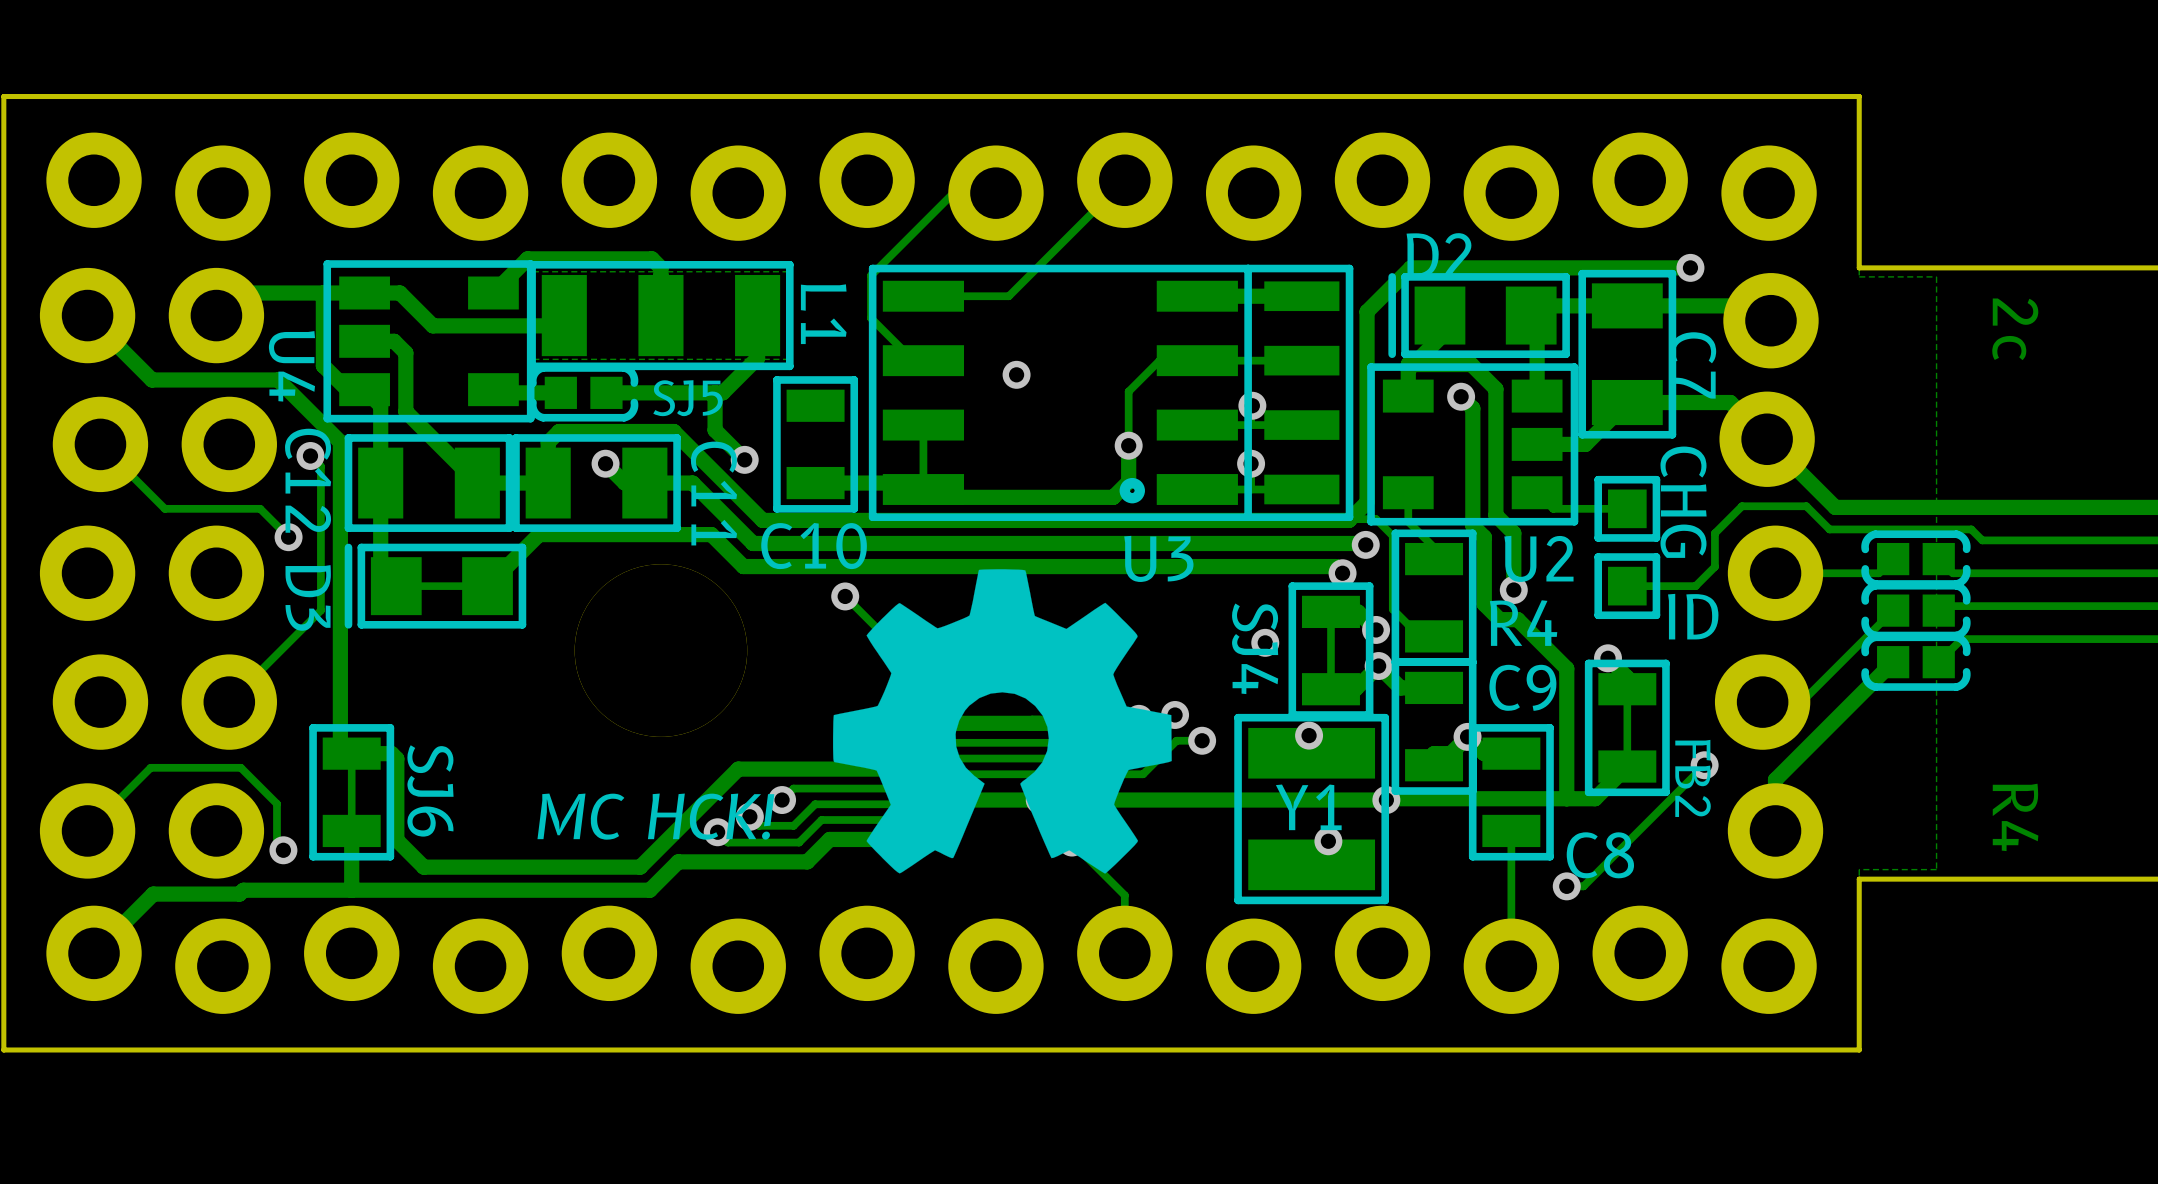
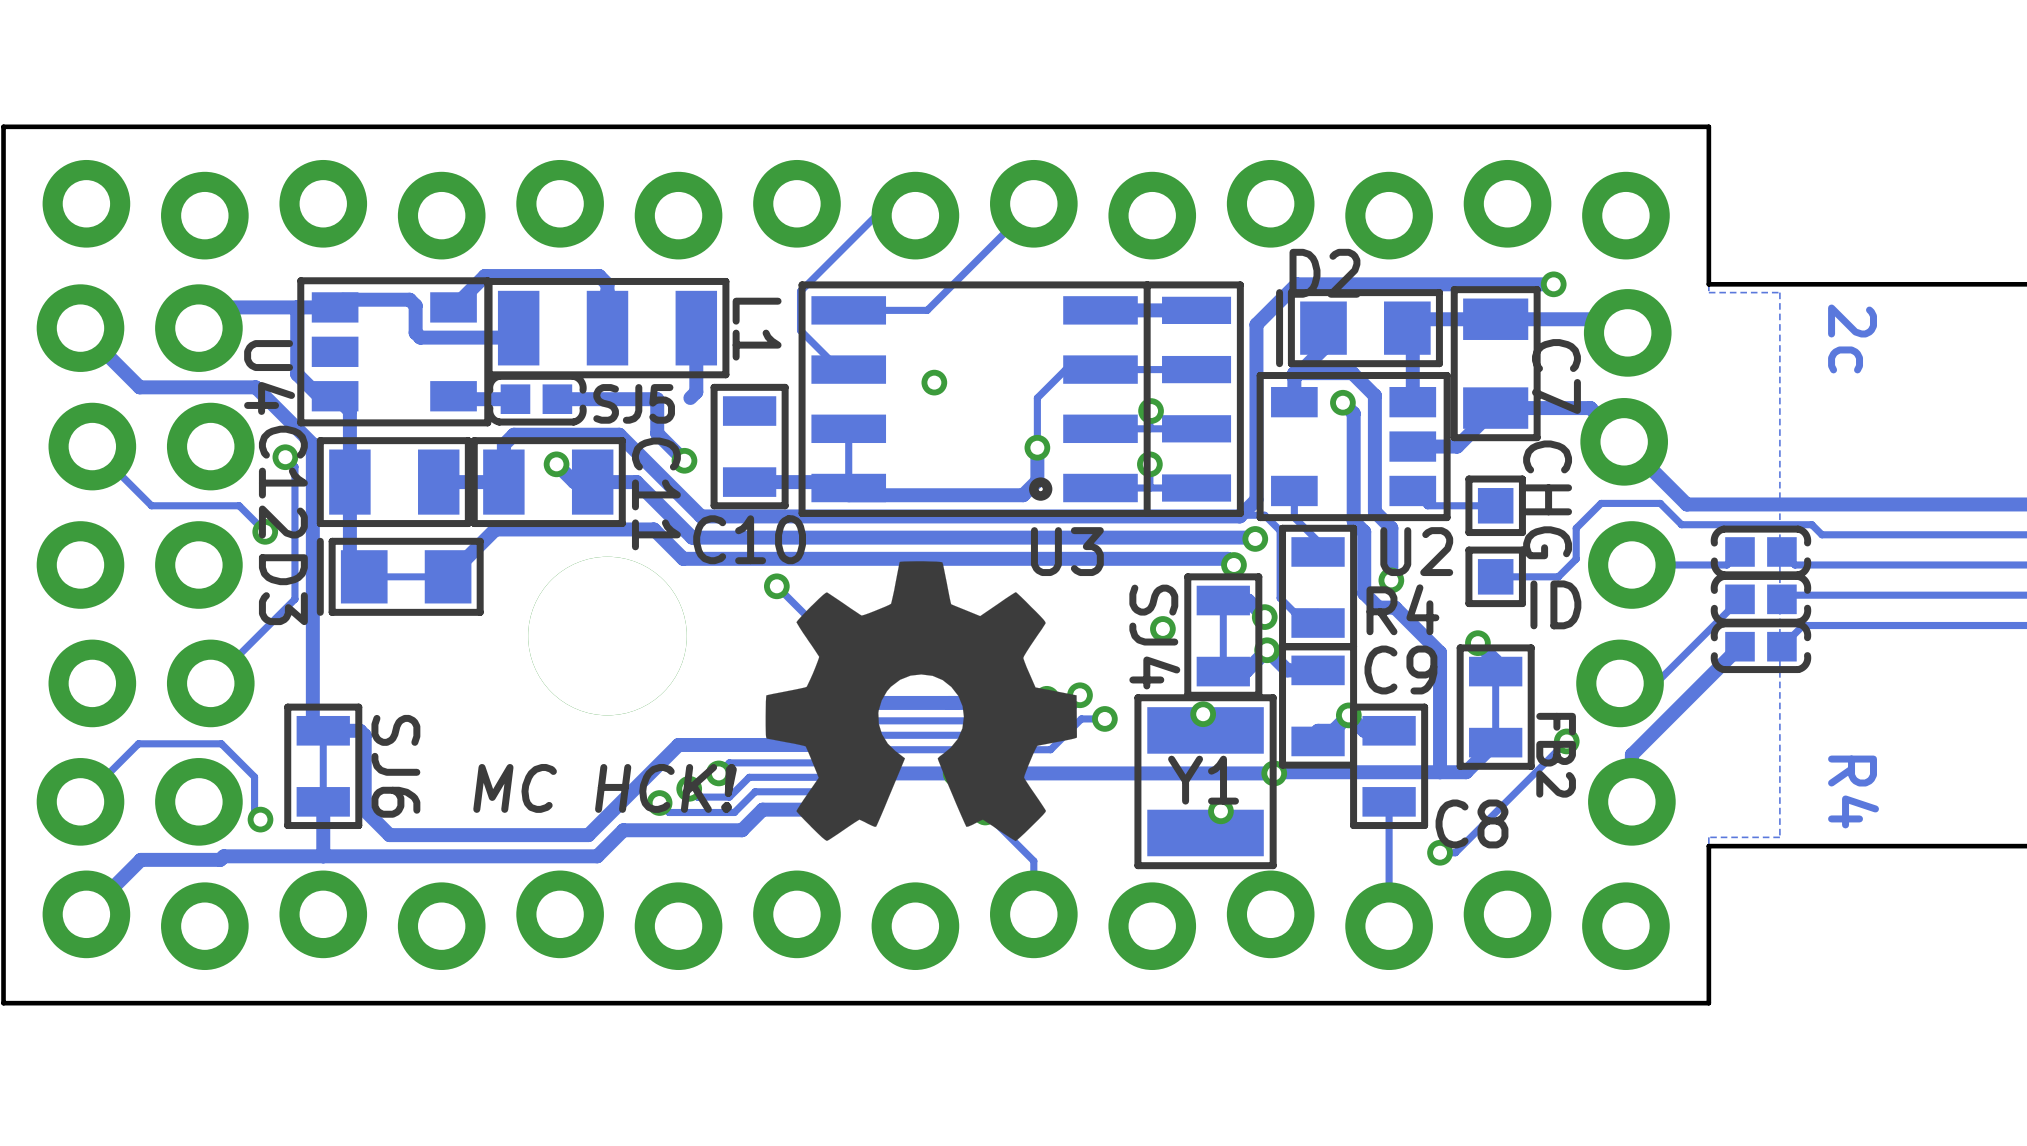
zone outline: (788, 271) (788, 359) (533, 359) (533, 271) (788, 271) -> none
track: (364, 293) (400, 293) (432, 325) (457, 325) -> (335, 307) (342, 299) (409, 299) (415, 305) (415, 332) (420, 337)
track: (364, 341) (394, 341) (405, 352) (405, 411) (477, 483) -> none
track: (757, 358) (722, 392) (715, 392) -> (696, 367) (696, 392) (690, 398)

